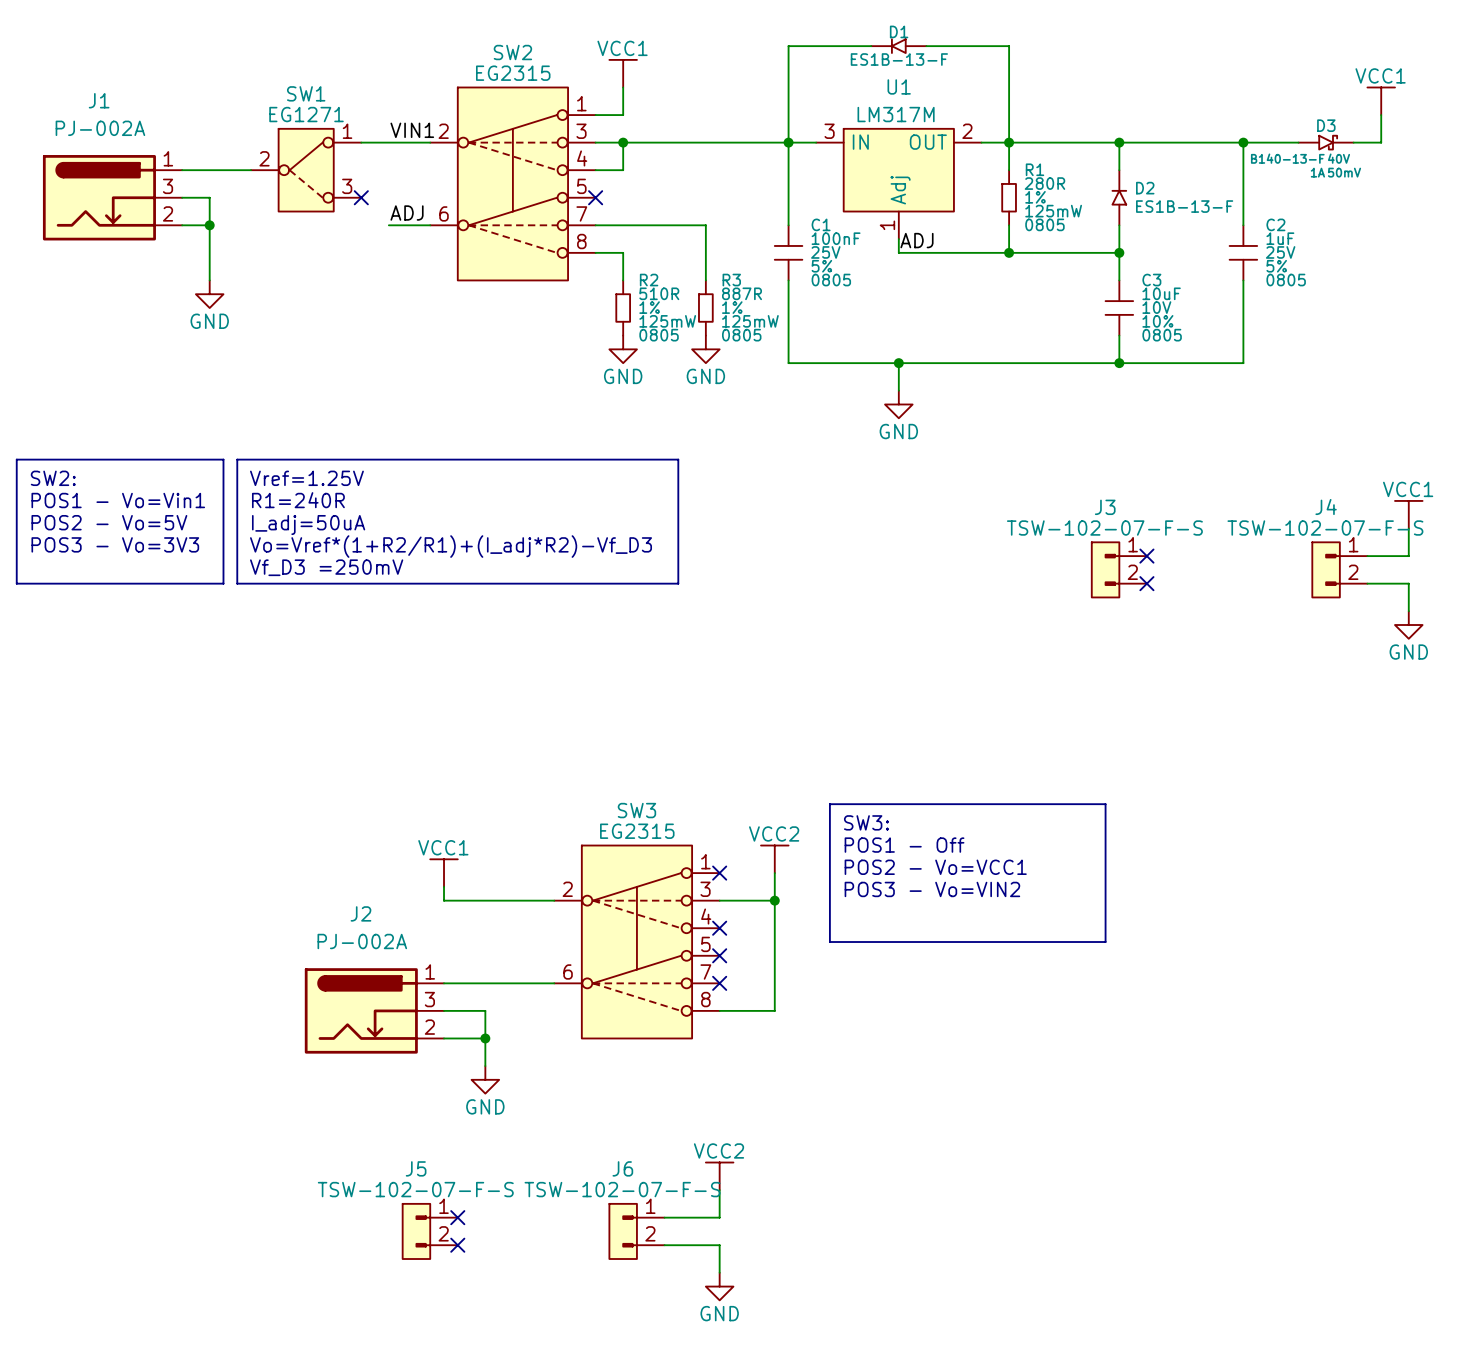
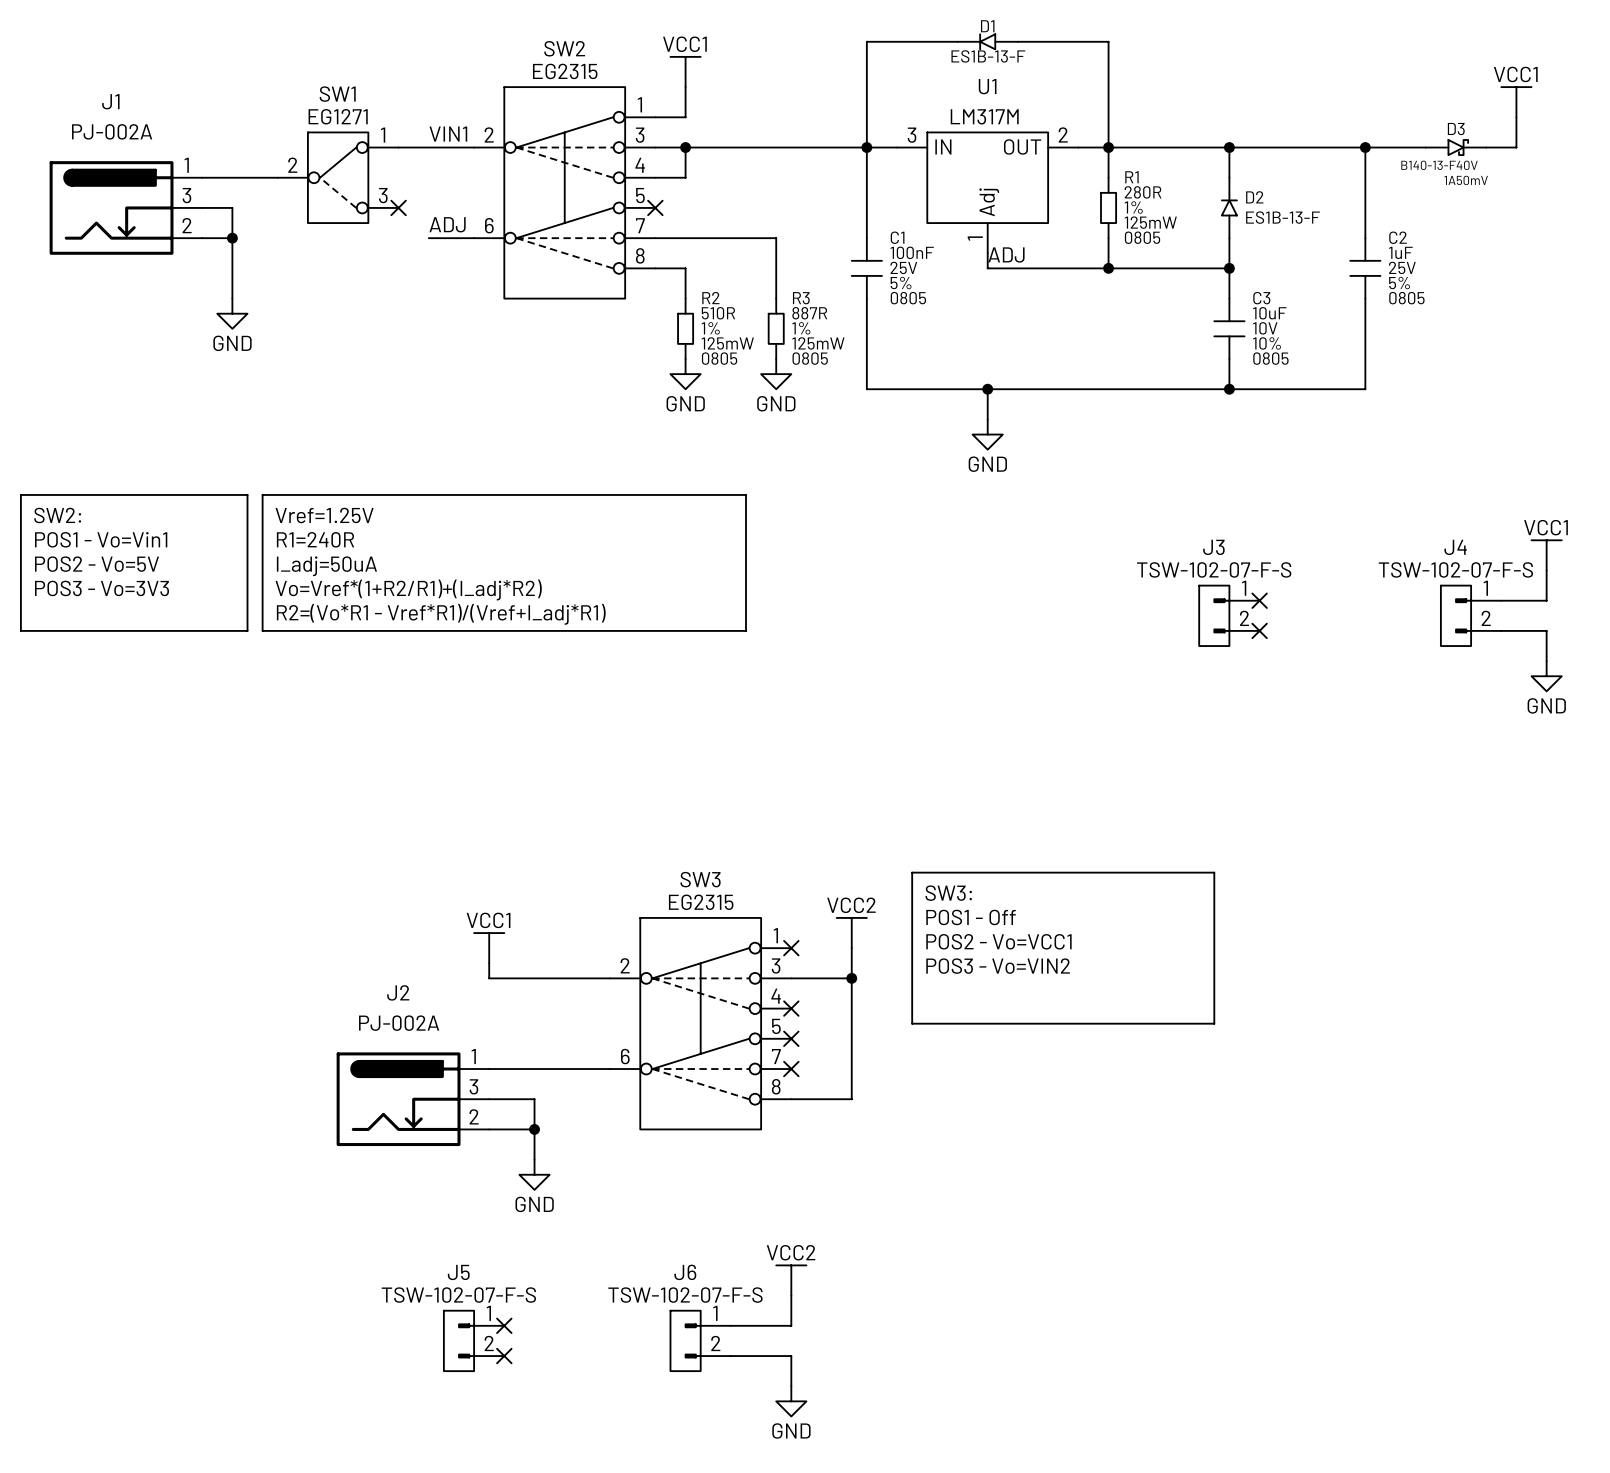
text: Vo=Vref*(1+R2/R1)+(I_adj*R2)-Vf_D3 (451, 546) -> Vo=Vref*(1+R2/R1)+(I_adj*R2) (408, 590)
text: Vf_D3 =250mV (326, 567) -> R2=(Vo*R1 - Vref*R1)/(Vref+I_adj*R1) (441, 614)

